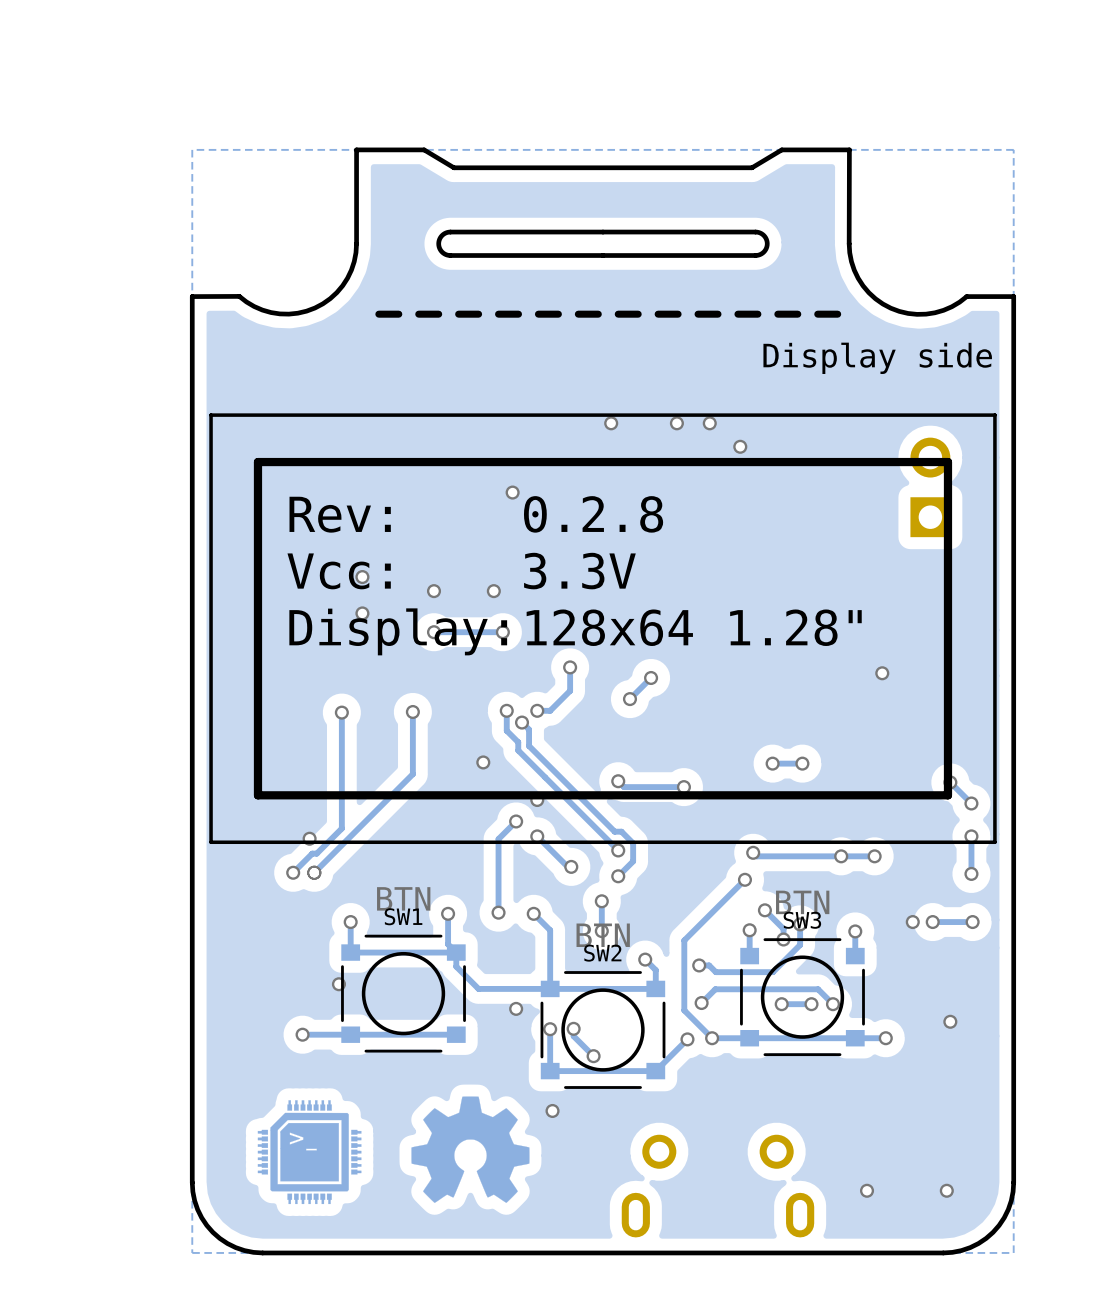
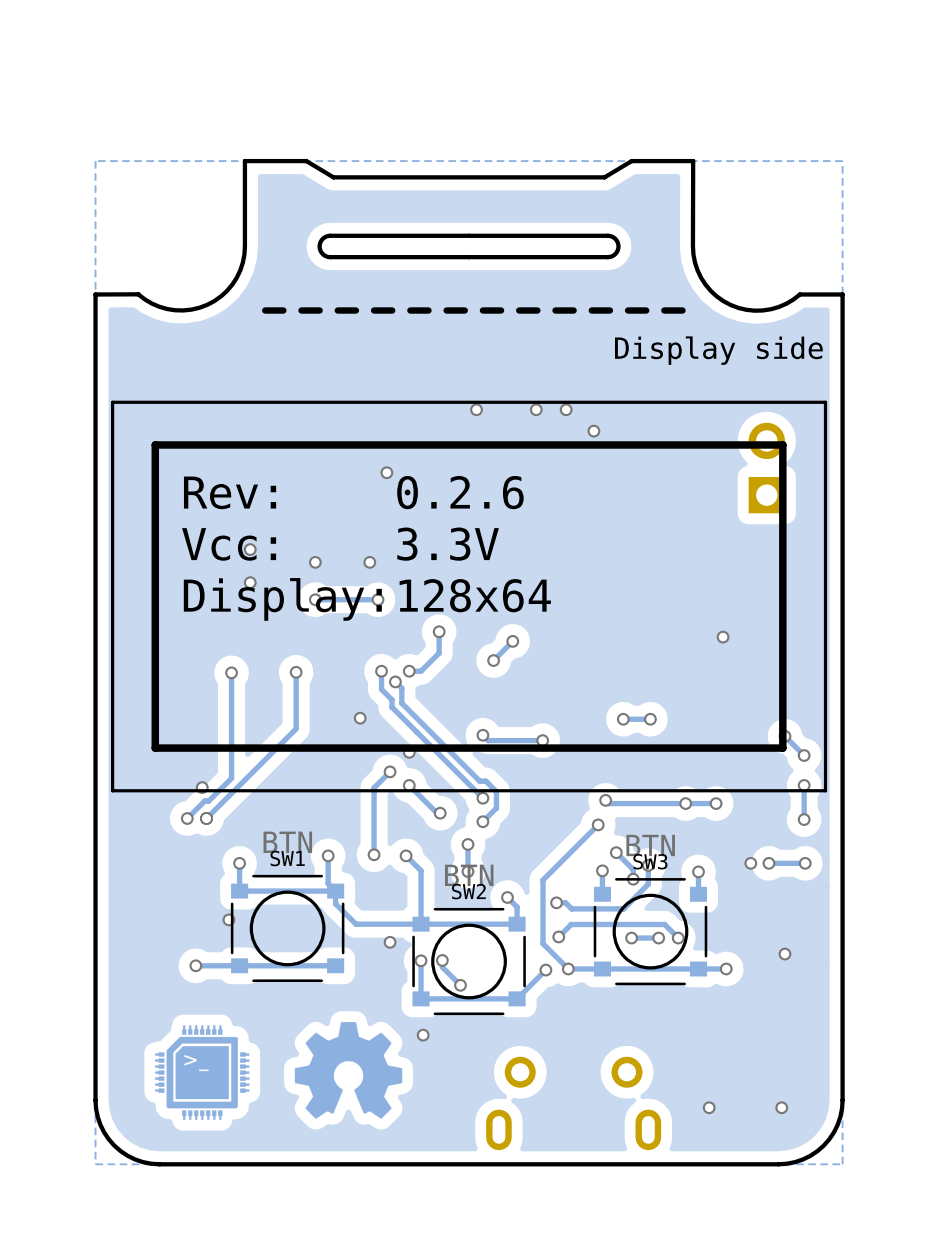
text: 0.2.8 (593, 514) -> 0.2.6 (460, 492)
text: 128x64 1.28" (694, 627) -> 128x64 (475, 595)

